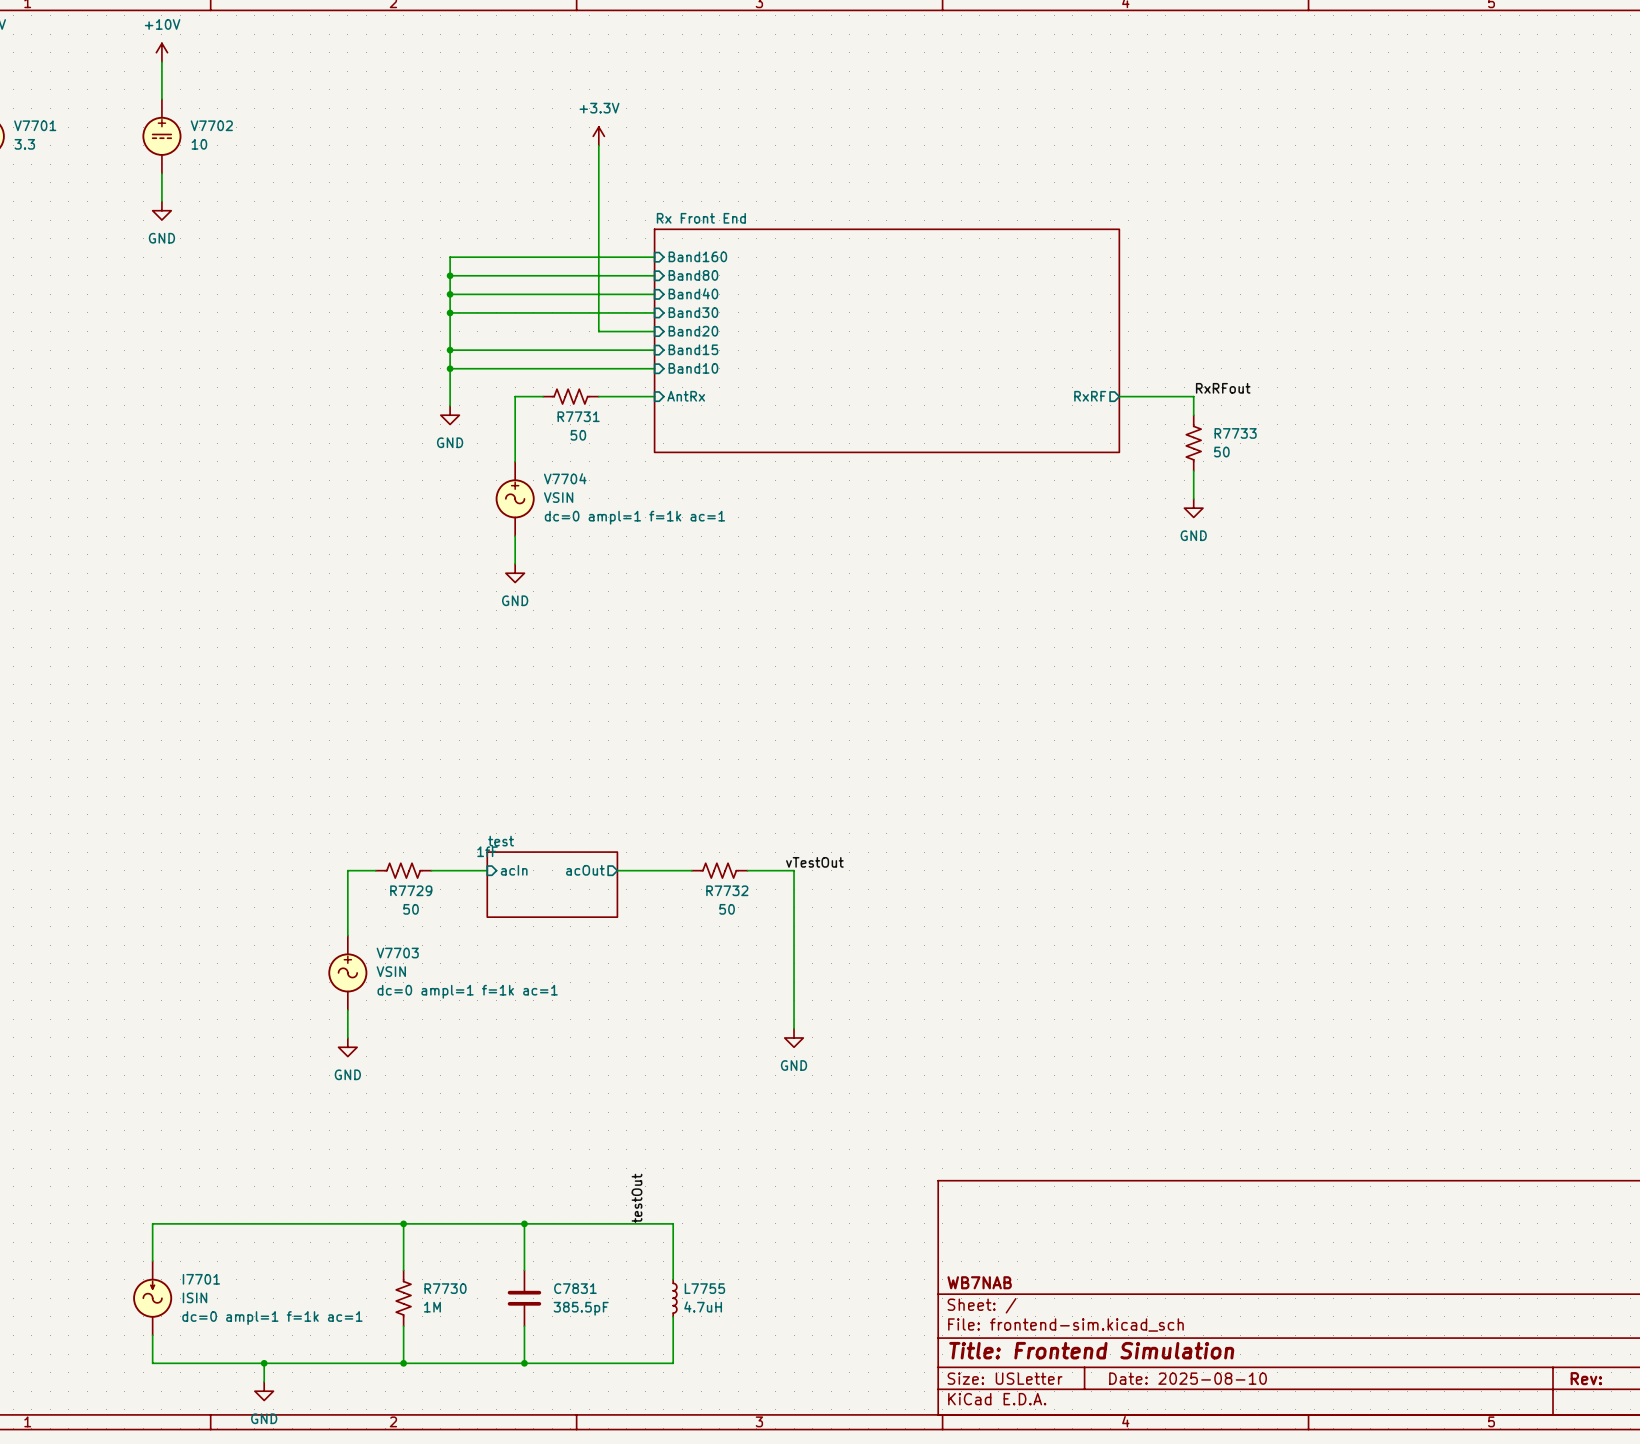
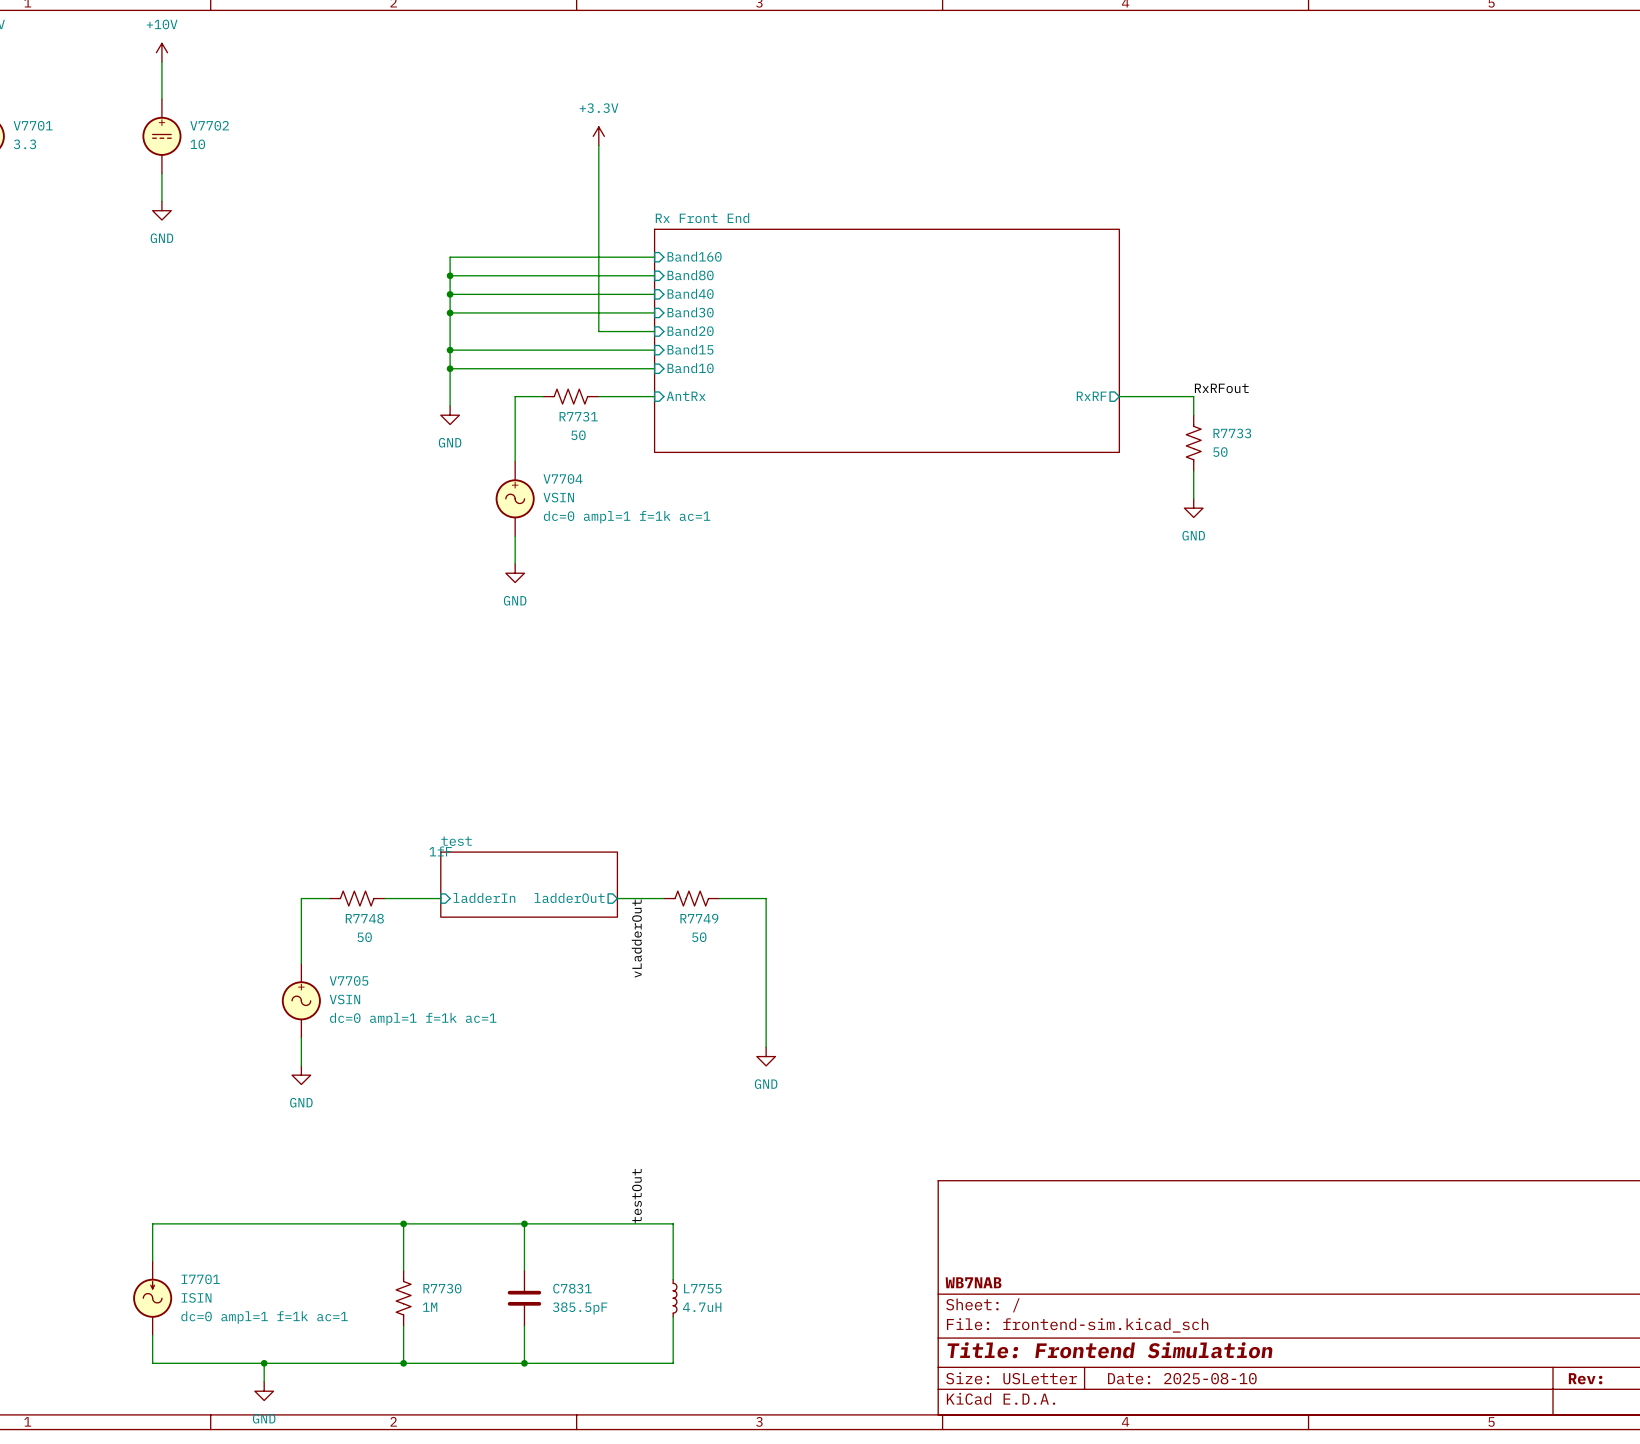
label: vTestOut (814, 862) -> none
wire: (375, 870) (347, 870) (347, 935) -> (329, 898) (301, 898) (301, 963)
R7729: 50 (403, 870) -> none
wire: (431, 870) (487, 870) -> (385, 898) (440, 898)
sheet pin: acIn (514, 870) -> none
sheet pin: acOut (585, 870) -> none
wire: (617, 870) (691, 870) -> none
R7732: 50 (719, 870) -> none
wire: (747, 870) (794, 870) (794, 1028) -> none
sheet test: none -> (529, 884)
sheet test: (552, 884) -> none
R7748: none -> 50 (357, 898)
sheet pin: none -> ladderIn (484, 898)
sheet pin: none -> ladderOut (569, 898)
wire: none -> (617, 898) (663, 898)
R7749: none -> 50 (691, 898)
wire: none -> (719, 898) (766, 898) (766, 1047)
label: none -> vLadderOut (636, 938)
V7703: VSIN (347, 972) -> none
V7705: none -> VSIN (301, 1000)
wire: (347, 1010) (347, 1037) -> (301, 1037) (301, 1065)
power symbol position: GND (794, 1037) -> GND (766, 1056)
power symbol position: GND (347, 1047) -> GND (301, 1075)

